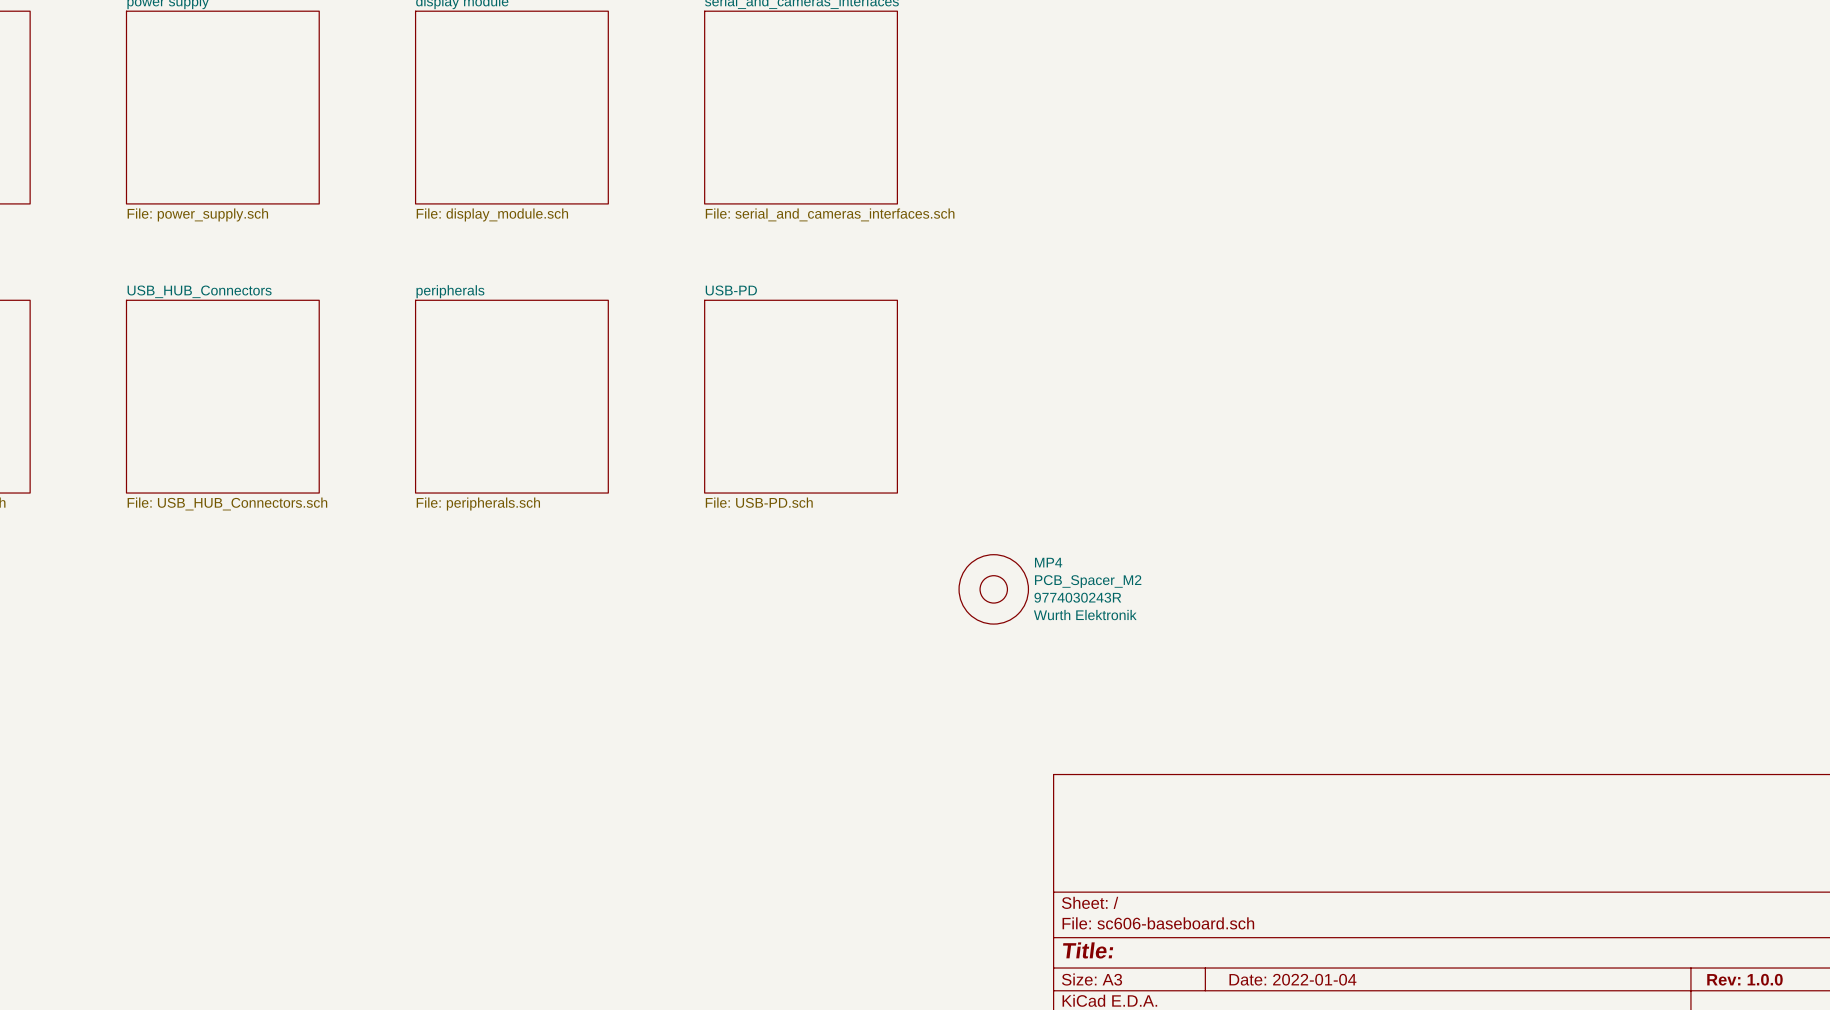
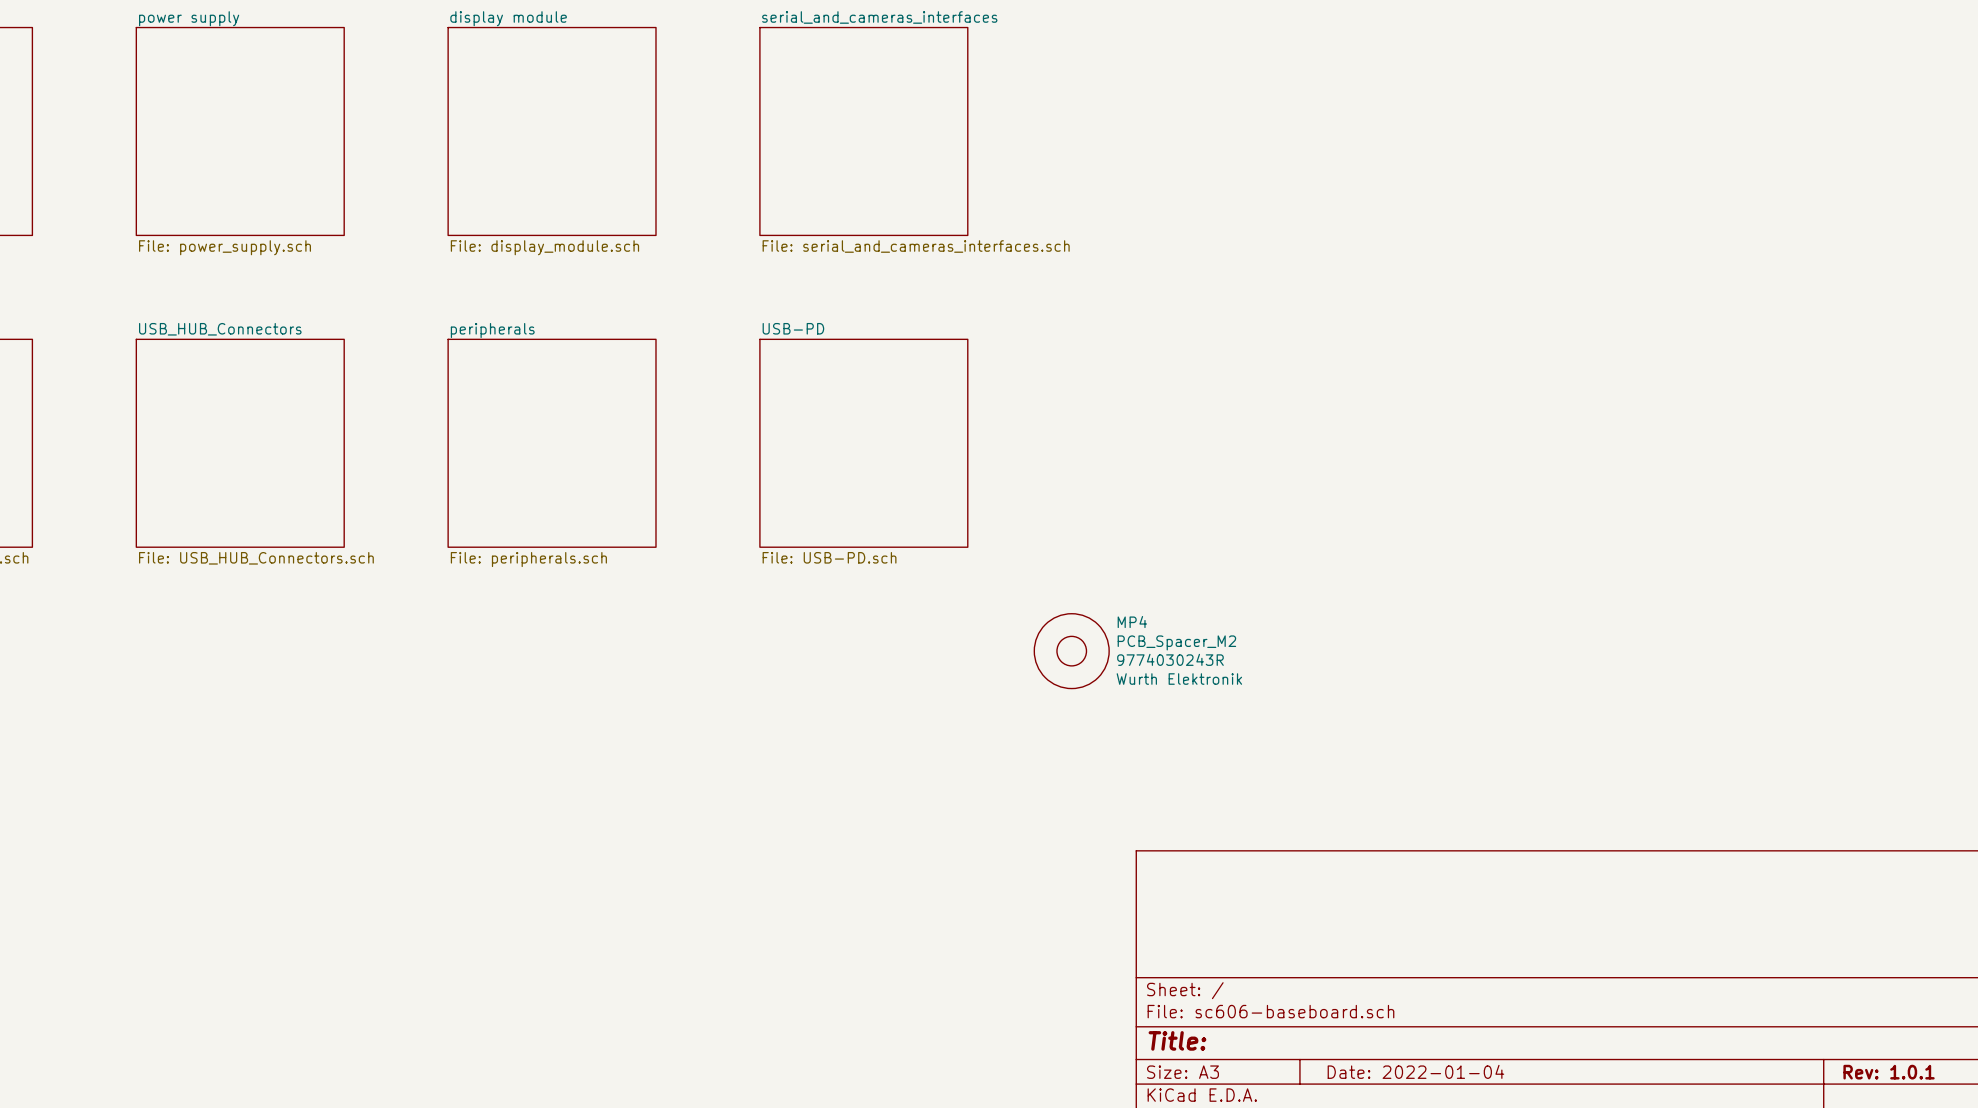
title block: Rev: 1.0.0 (1744, 979) -> Rev: 1.0.1 (1889, 1072)

